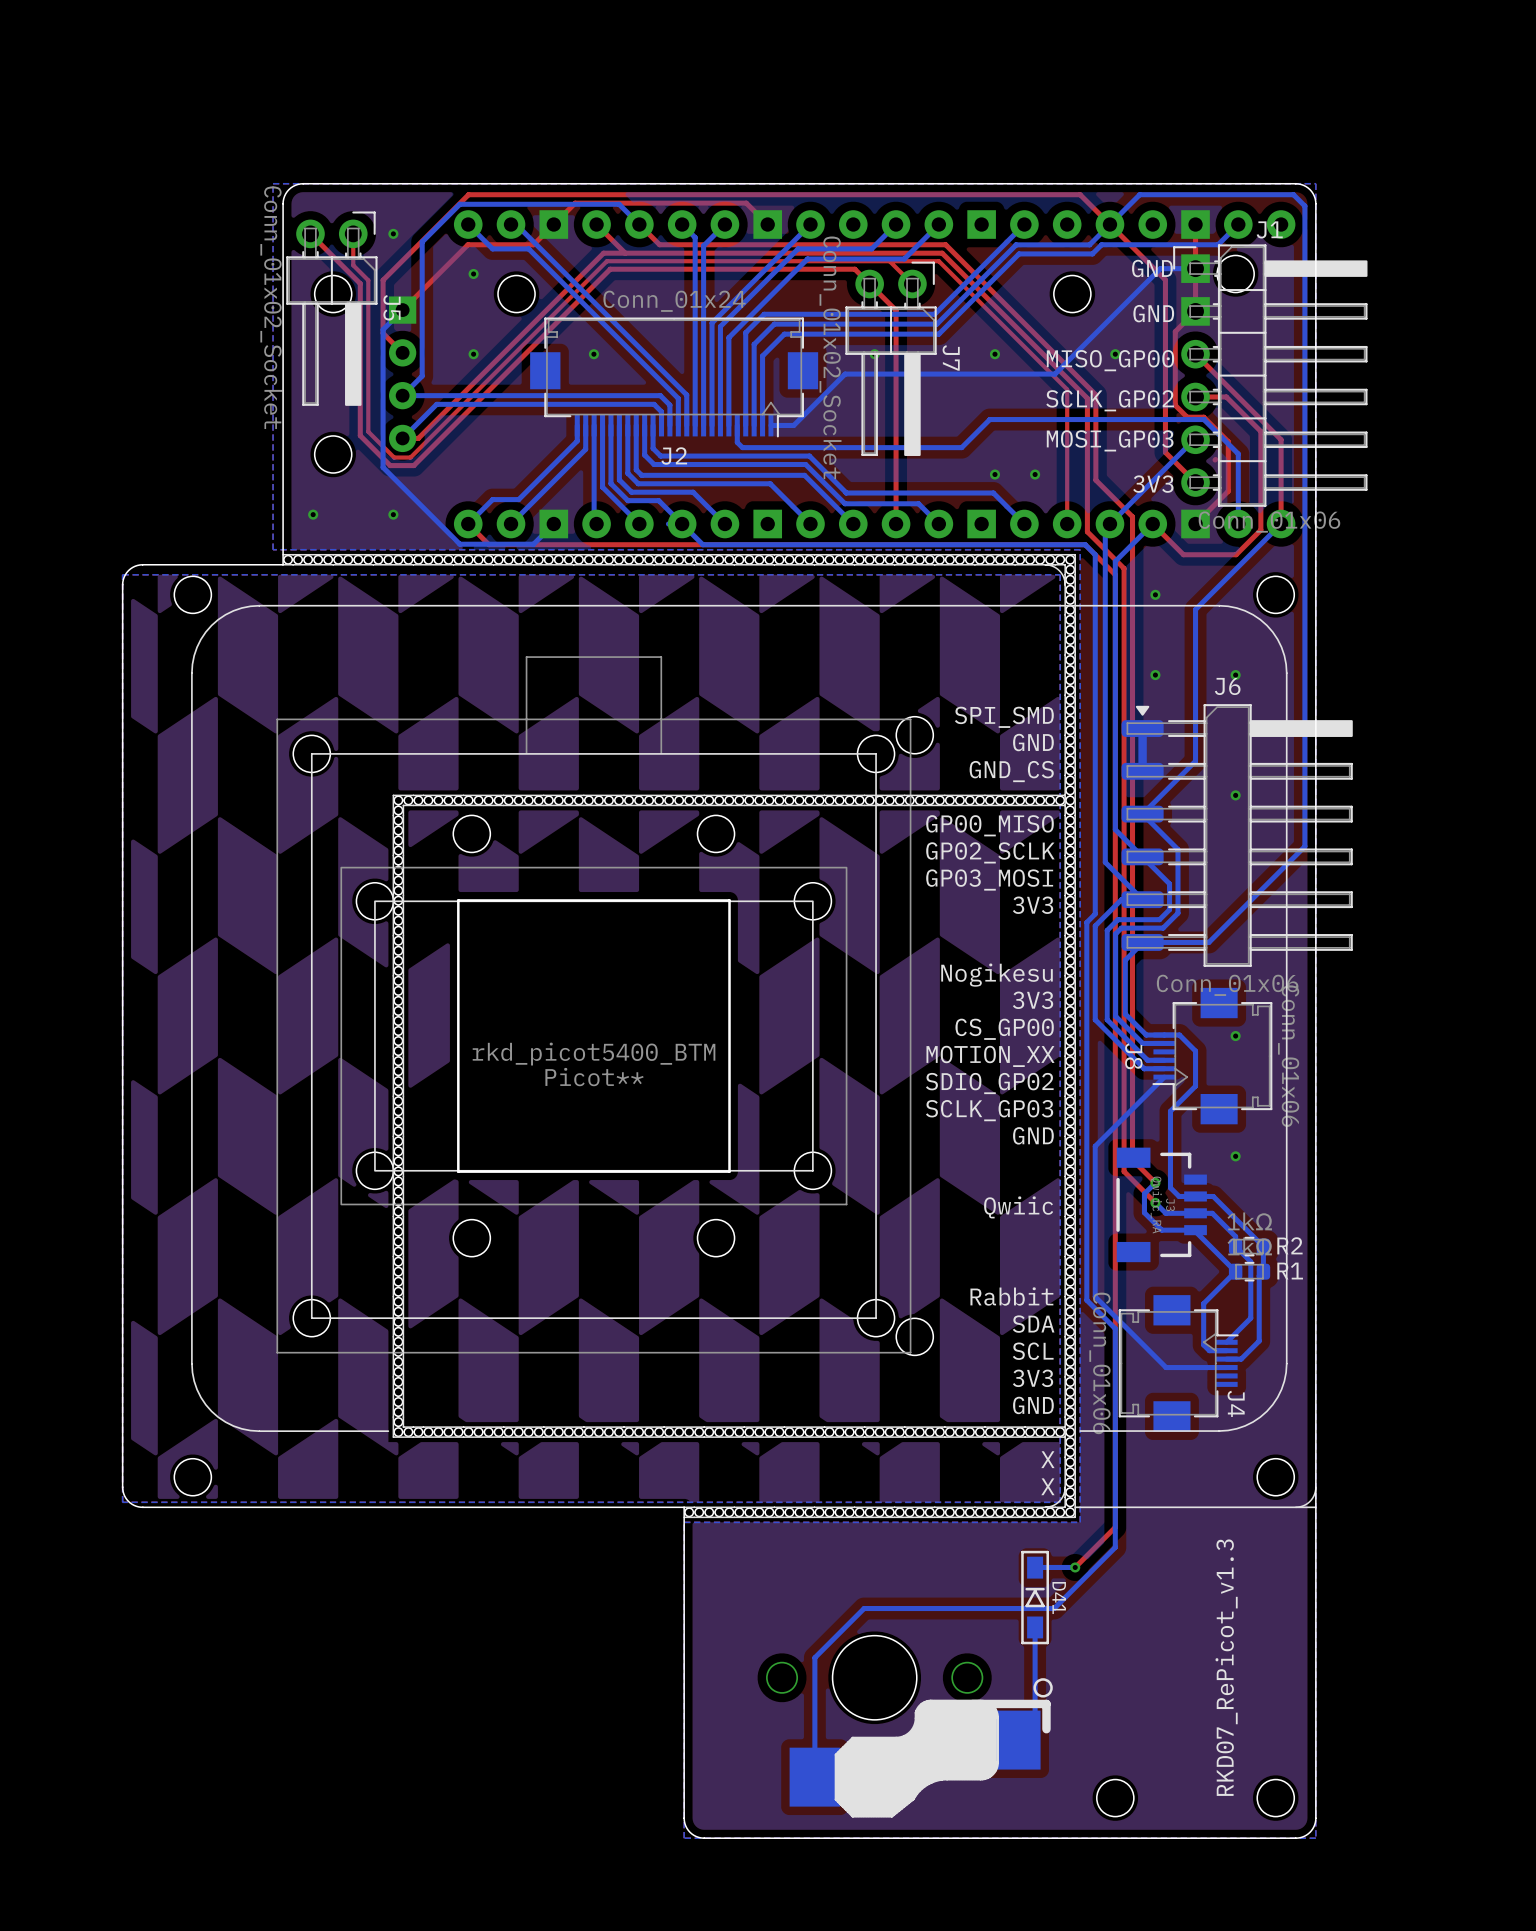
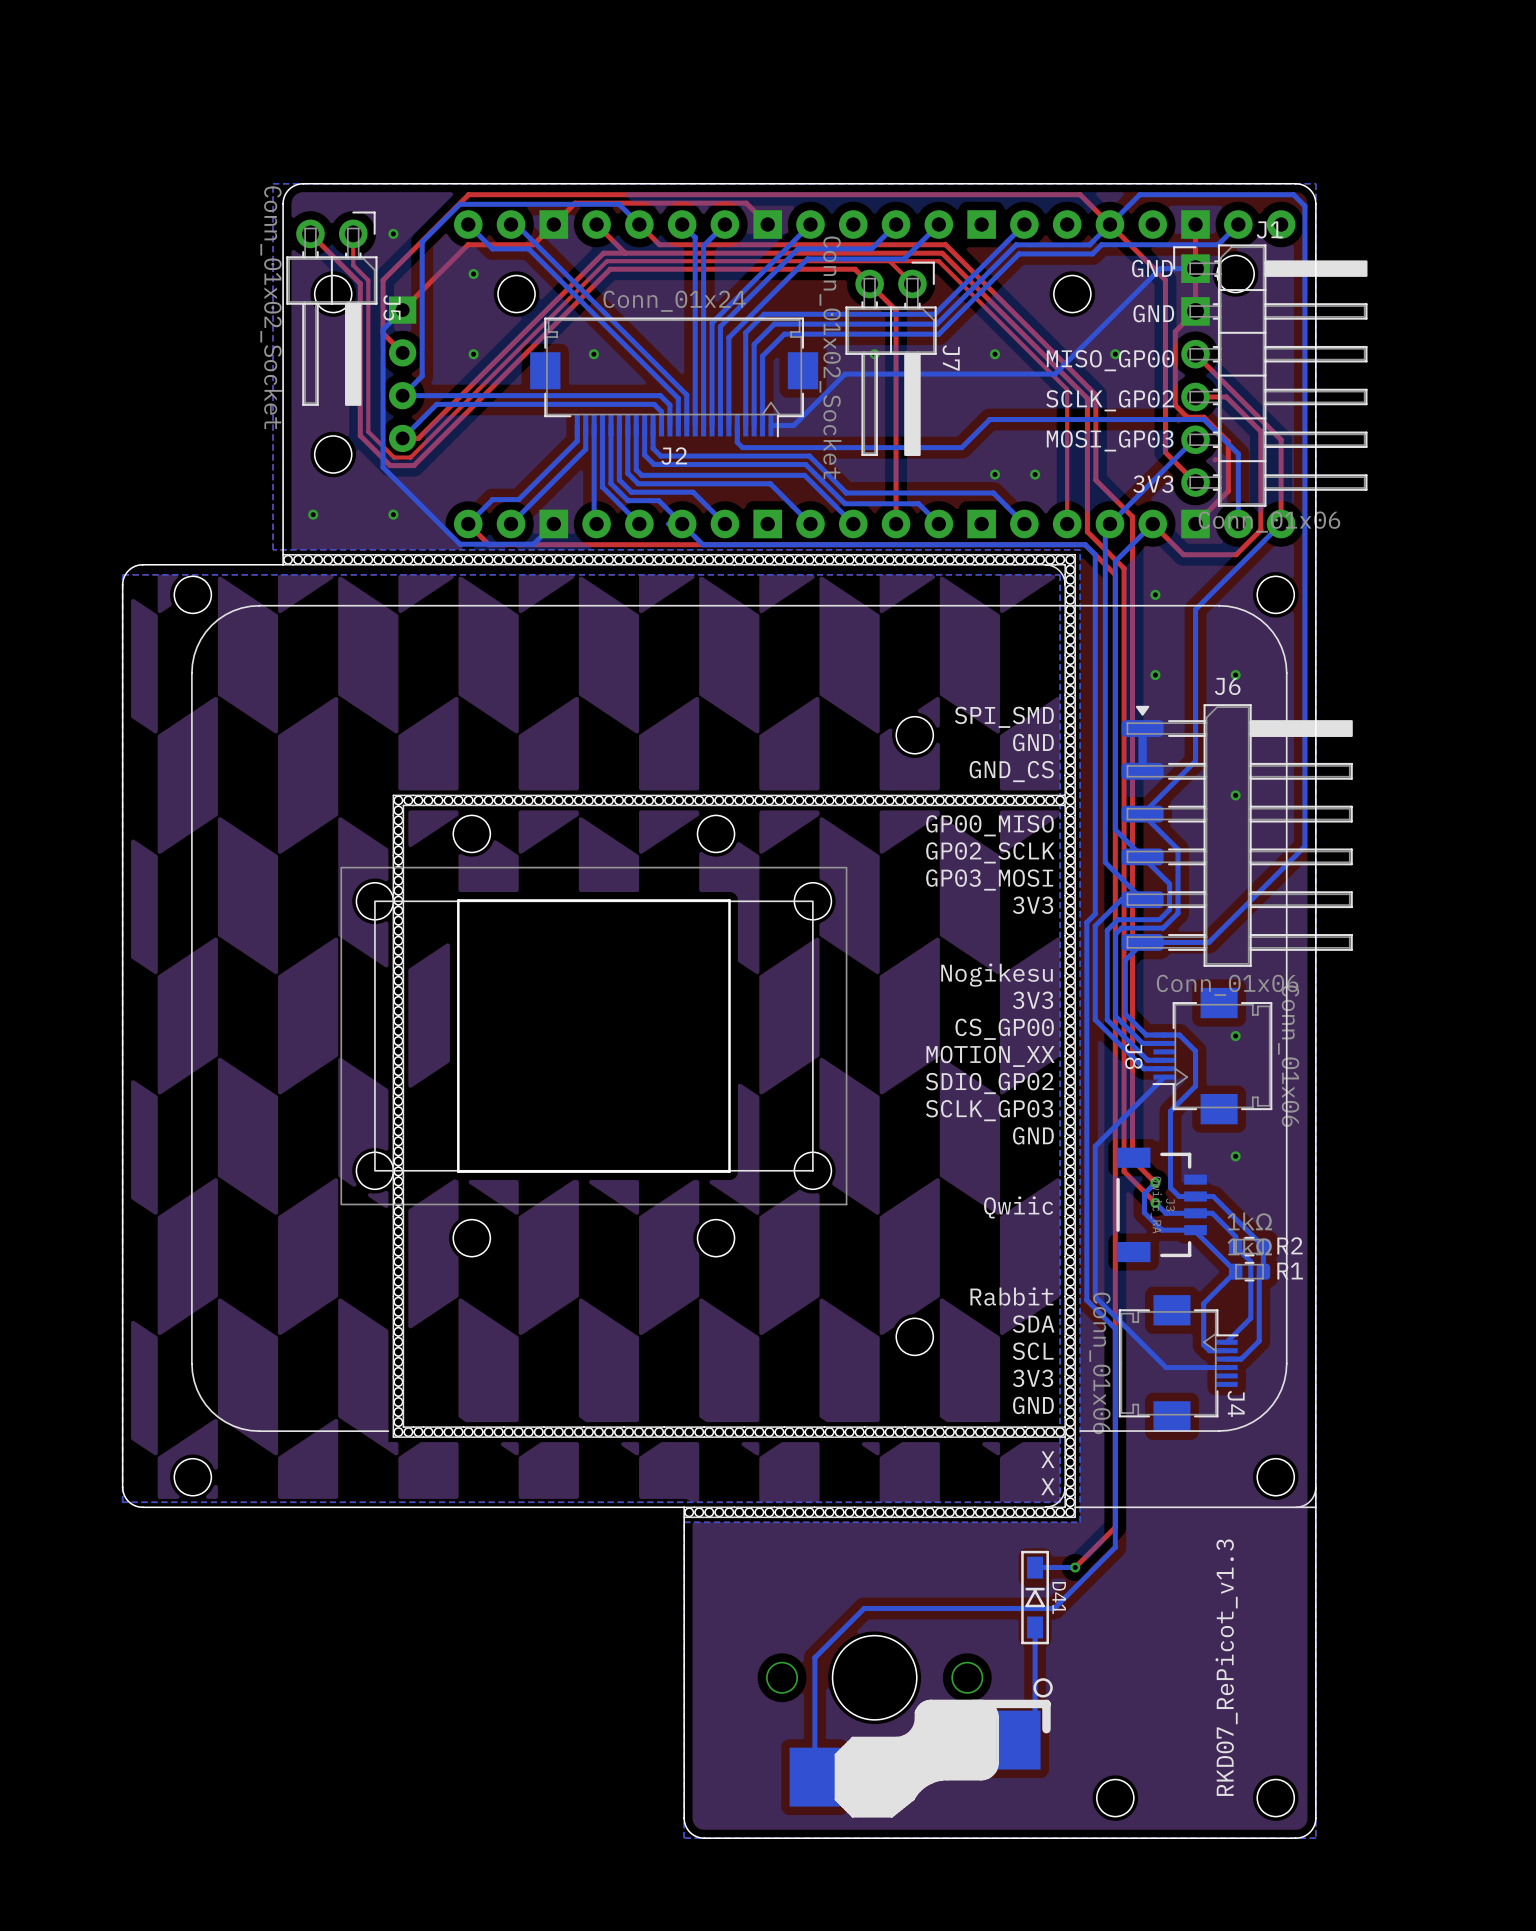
Picot**: rkd_picot5400_BTM (593, 1004) -> none

